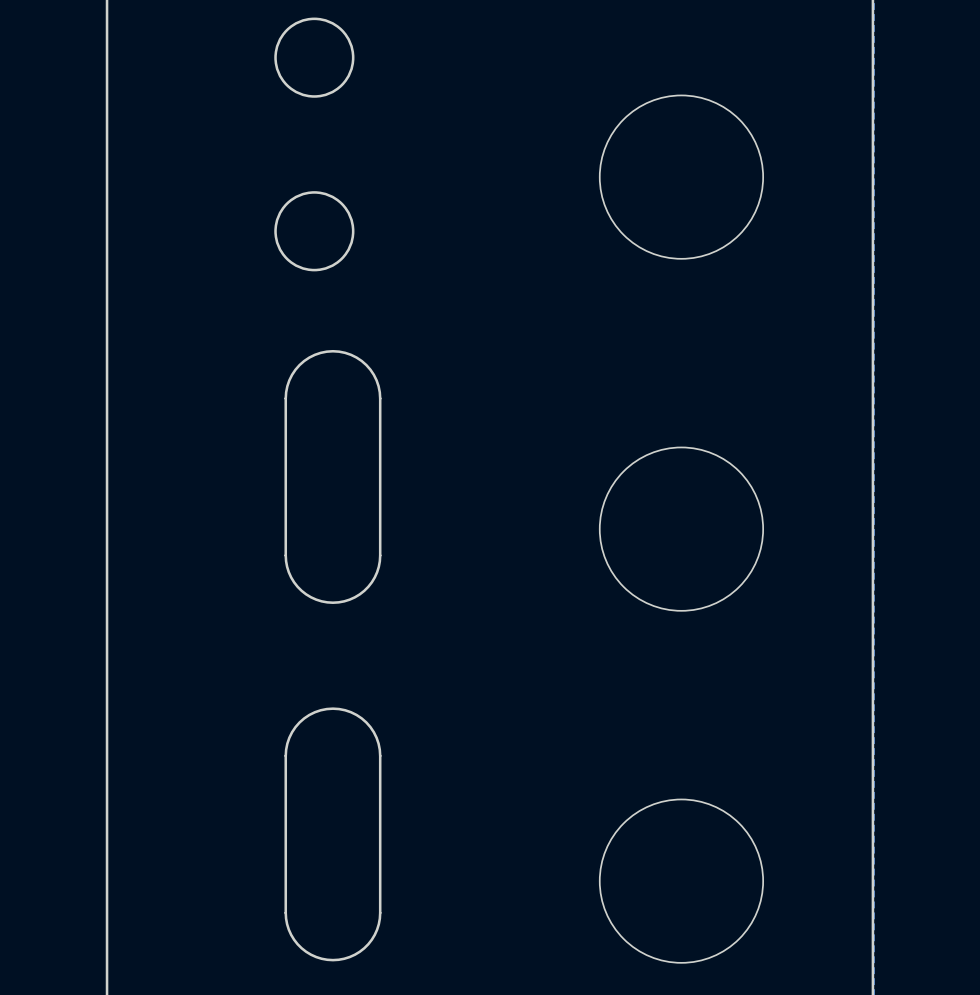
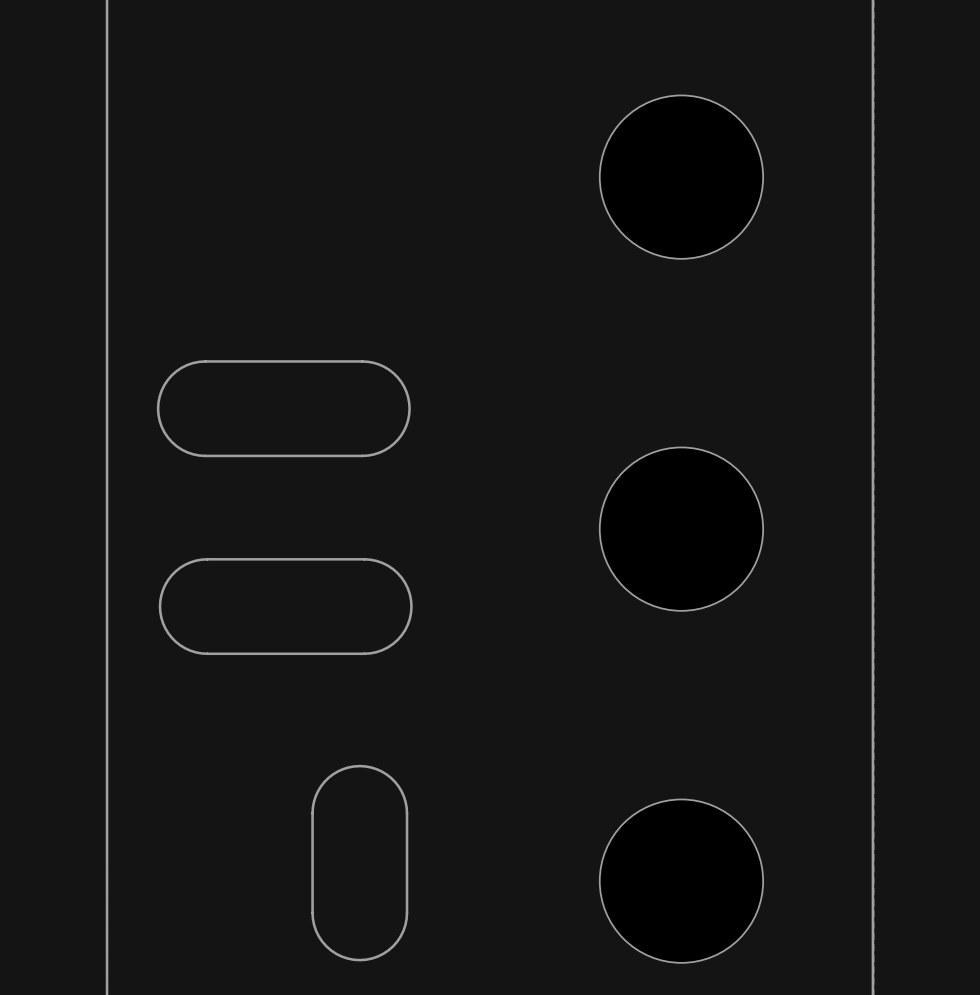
round board edge: [274, 17, 355, 98] -> none
round board edge: [274, 191, 355, 272] -> none
board edge: none -> (362, 361) (193, 363) (176, 371) (164, 385) (158, 402) (159, 420) (164, 432) (171, 442) (187, 452) (199, 455) (373, 454) (389, 447) (401, 435) (408, 419) (409, 402) (404, 386) (393, 373) (379, 364) (362, 361)
board edge: (380, 398) (378, 566) (371, 582) (359, 594) (338, 602) (321, 601) (311, 597) (297, 586) (291, 577) (286, 561) (285, 398) (287, 386) (295, 369) (304, 361) (320, 352) (339, 351) (356, 357) (370, 369) (376, 380) (380, 398) -> none
board edge: none -> (364, 559) (195, 560) (180, 567) (168, 579) (160, 600) (161, 617) (168, 633) (175, 641) (185, 648) (201, 653) (364, 653) (376, 652) (392, 644) (401, 635) (409, 618) (411, 600) (405, 582) (392, 569) (376, 560) (364, 559)
board edge: (380, 755) (378, 924) (371, 939) (354, 954) (338, 959) (321, 958) (306, 951) (297, 944) (291, 934) (286, 918) (285, 755) (287, 743) (295, 727) (309, 714) (326, 709) (339, 709) (356, 714) (370, 727) (376, 737) (380, 755) -> none
board edge: none -> (407, 813) (407, 912) (403, 930) (393, 946) (377, 956) (359, 960) (341, 956) (331, 950) (322, 941) (316, 930) (312, 919) (312, 813) (317, 791) (324, 782) (337, 771) (354, 766) (371, 767) (386, 774) (395, 782) (403, 796) (407, 813)

